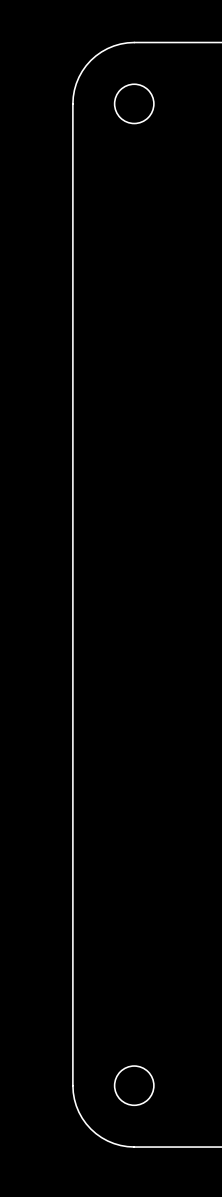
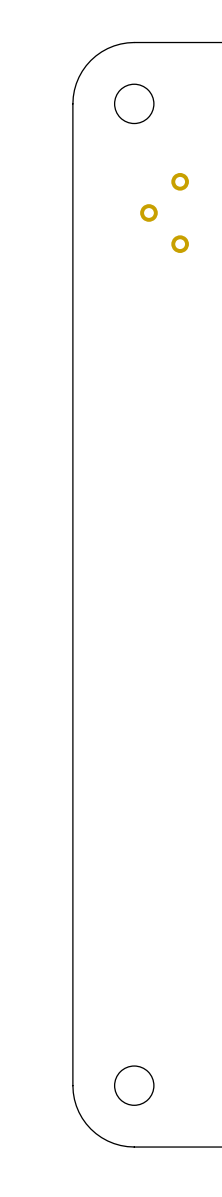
part: none -> (164, 212)

